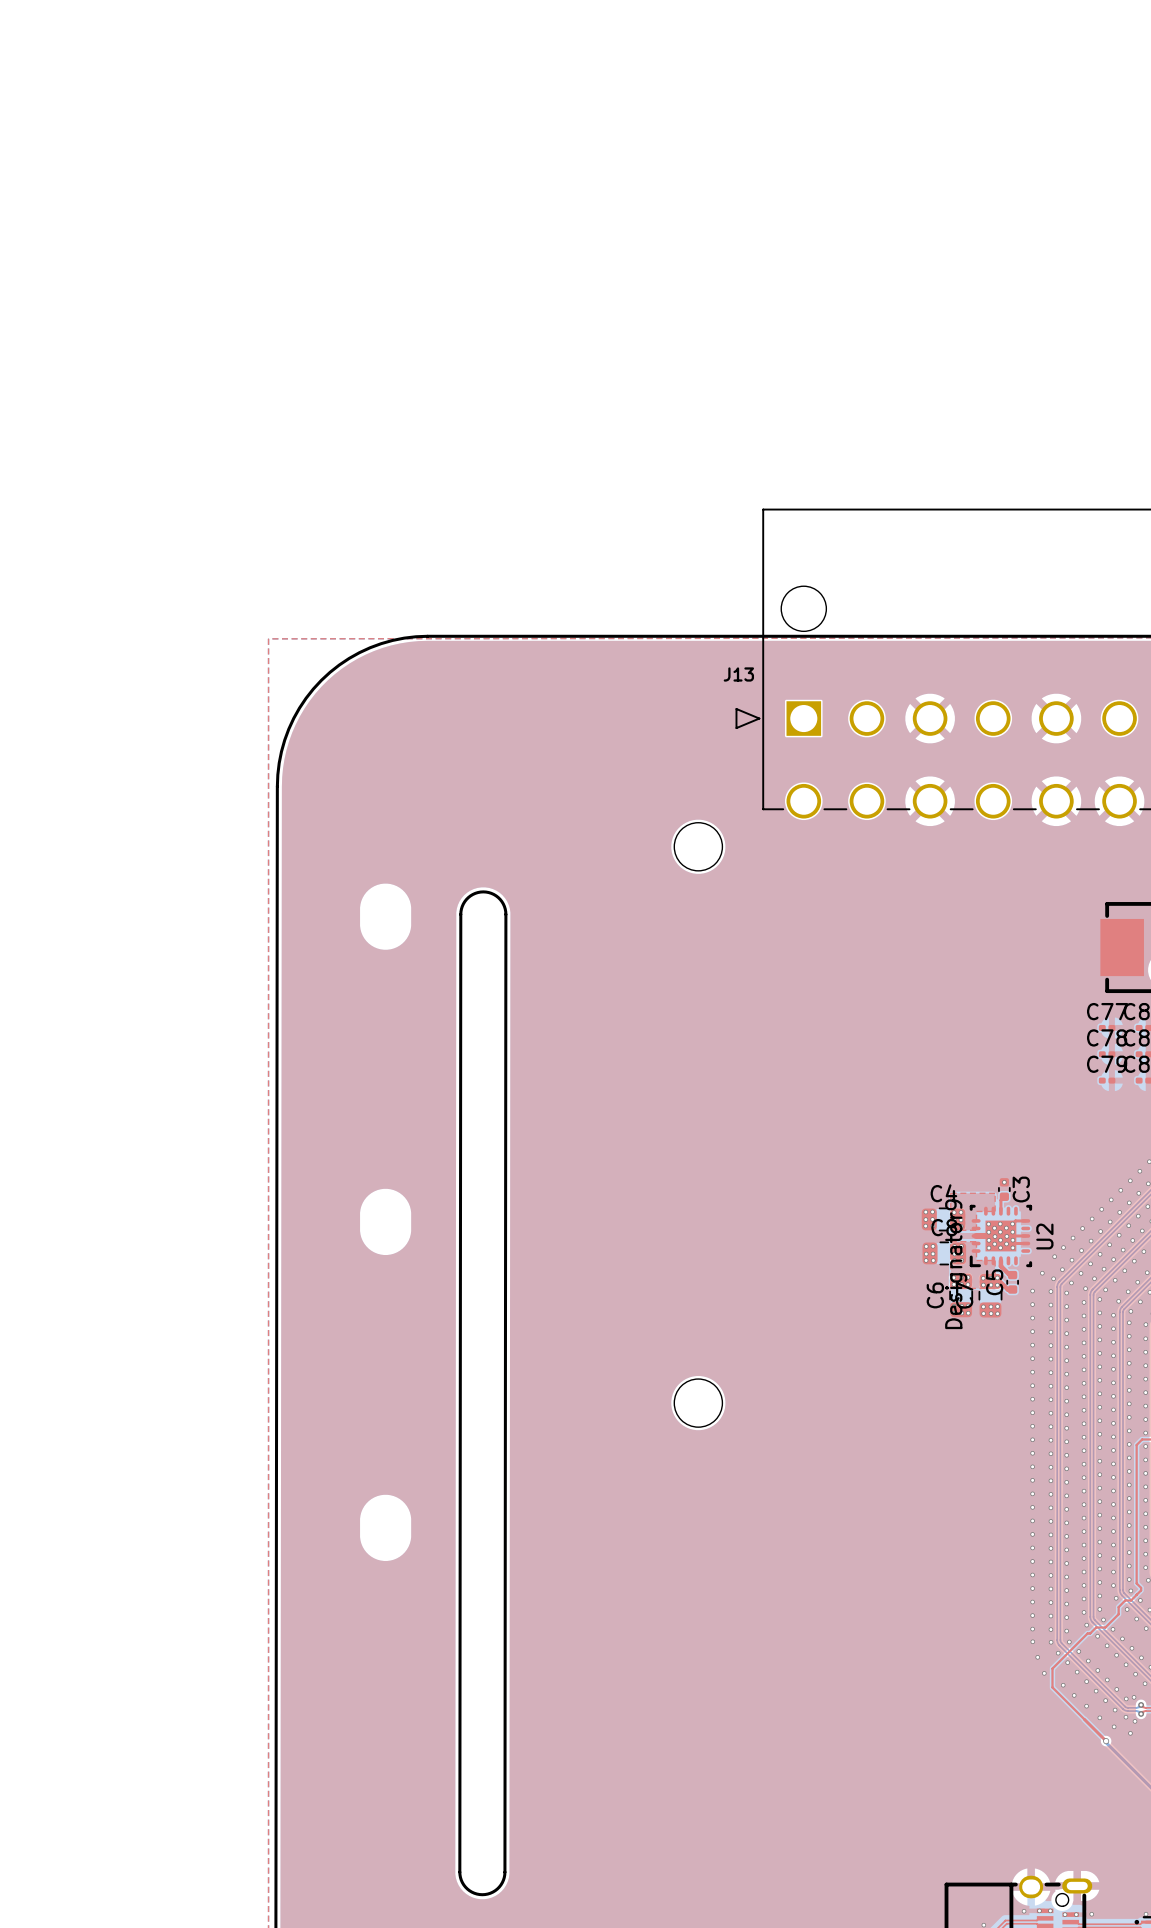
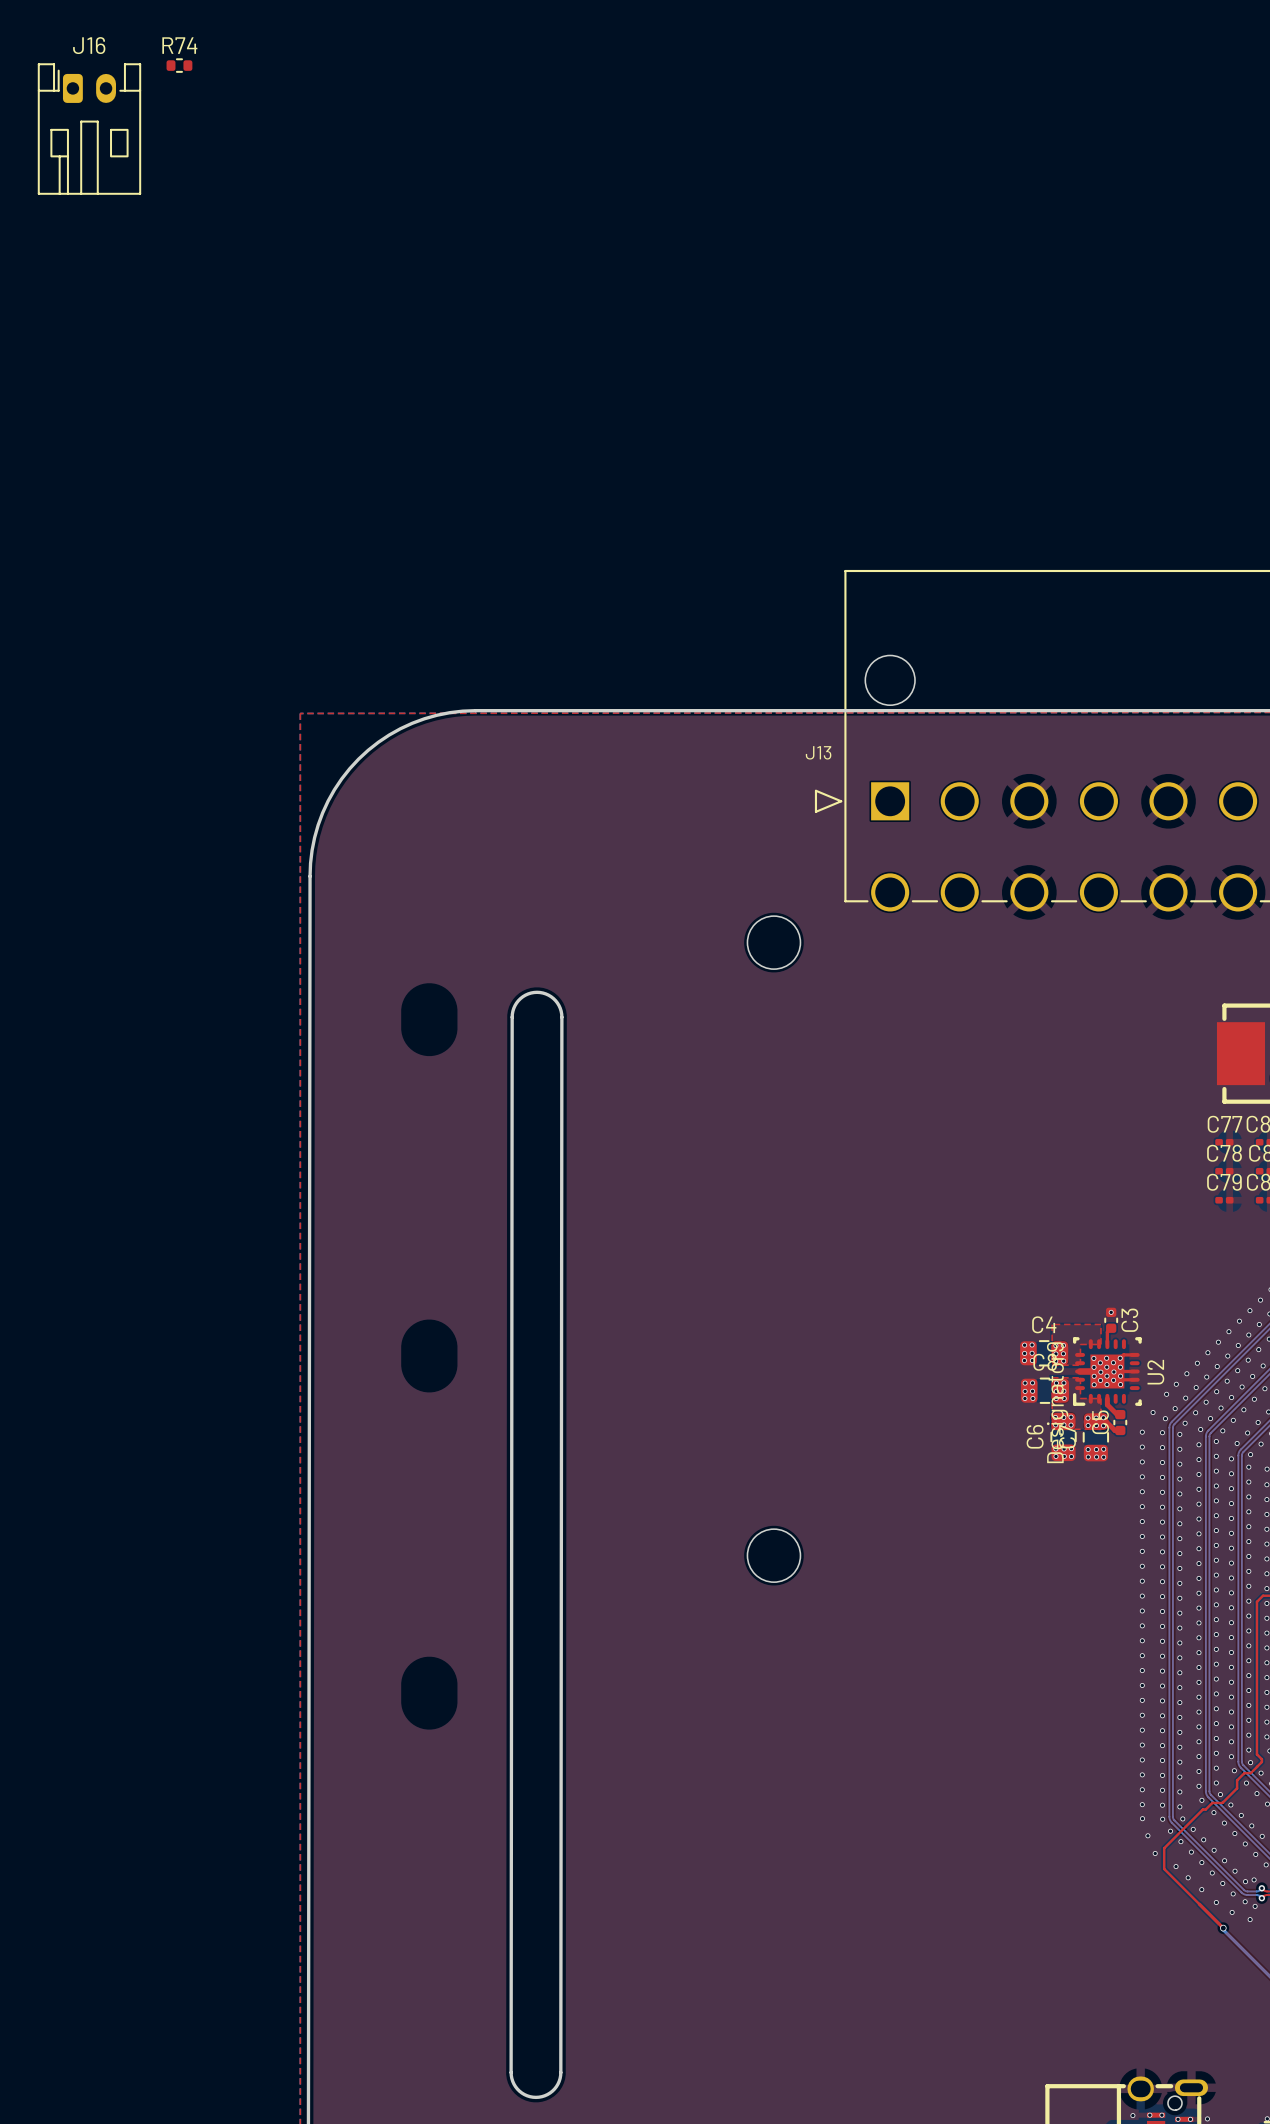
R74: none -> (179, 65)
J16: none -> (89, 129)

